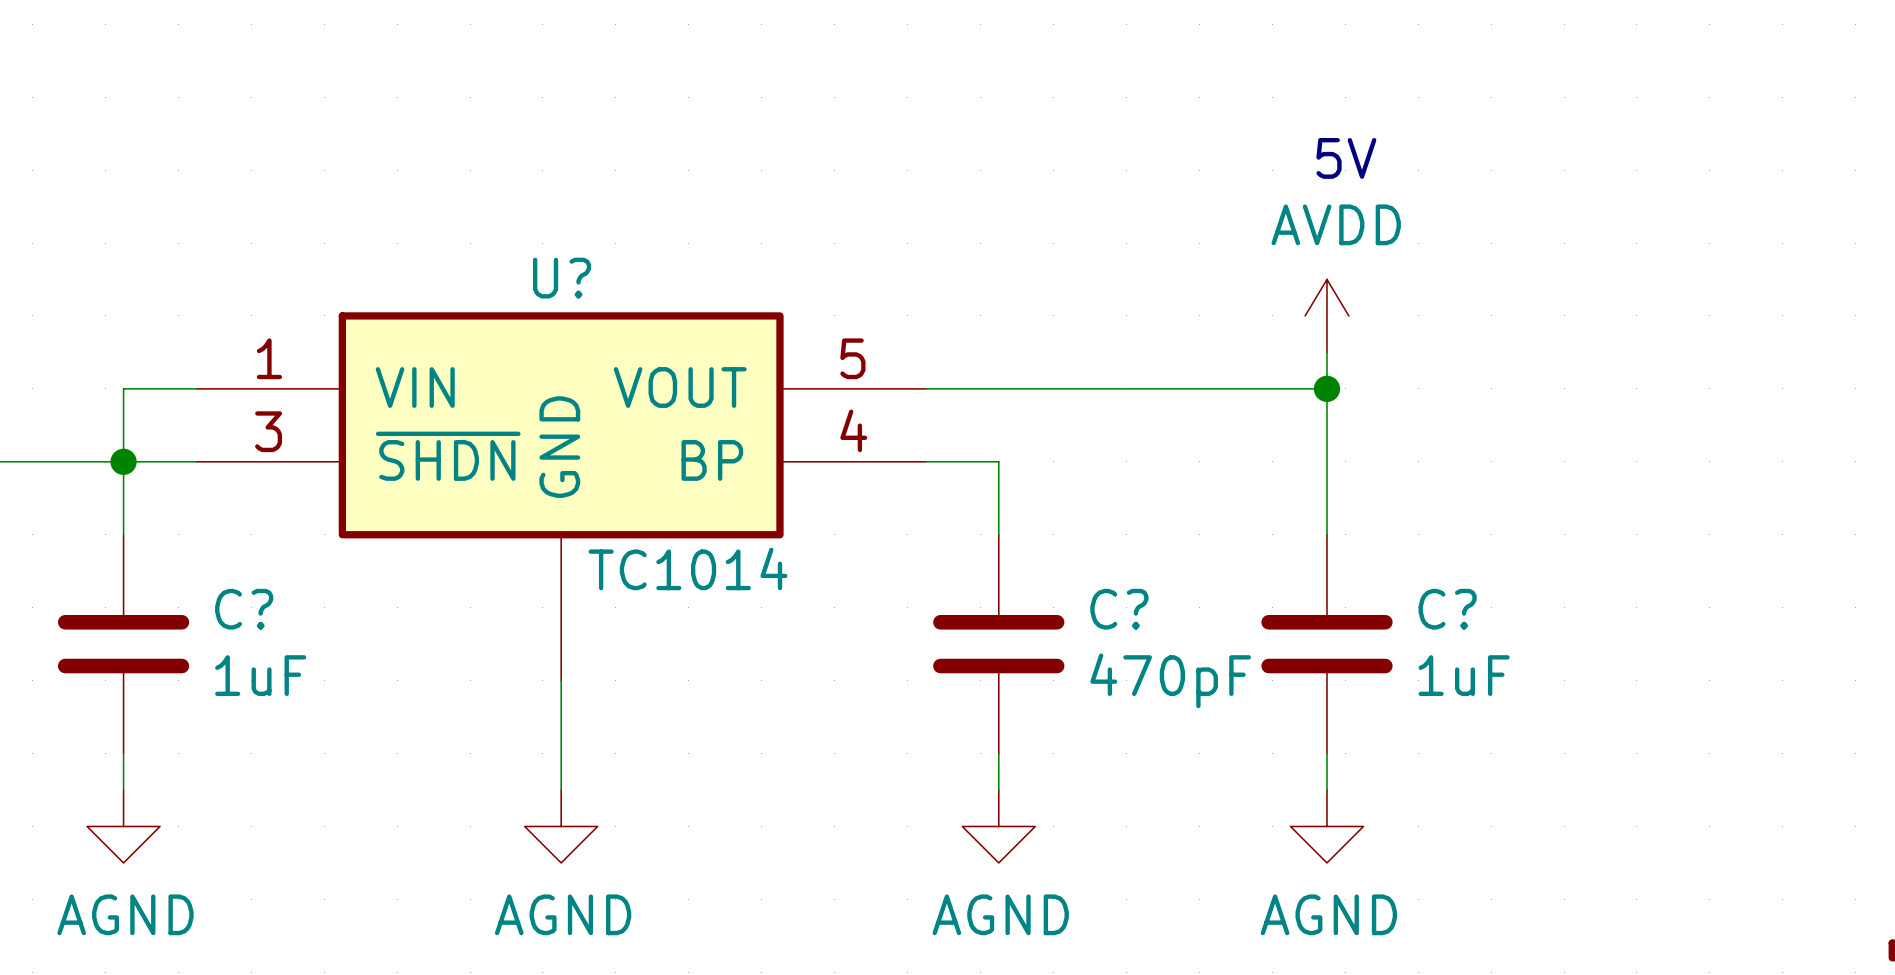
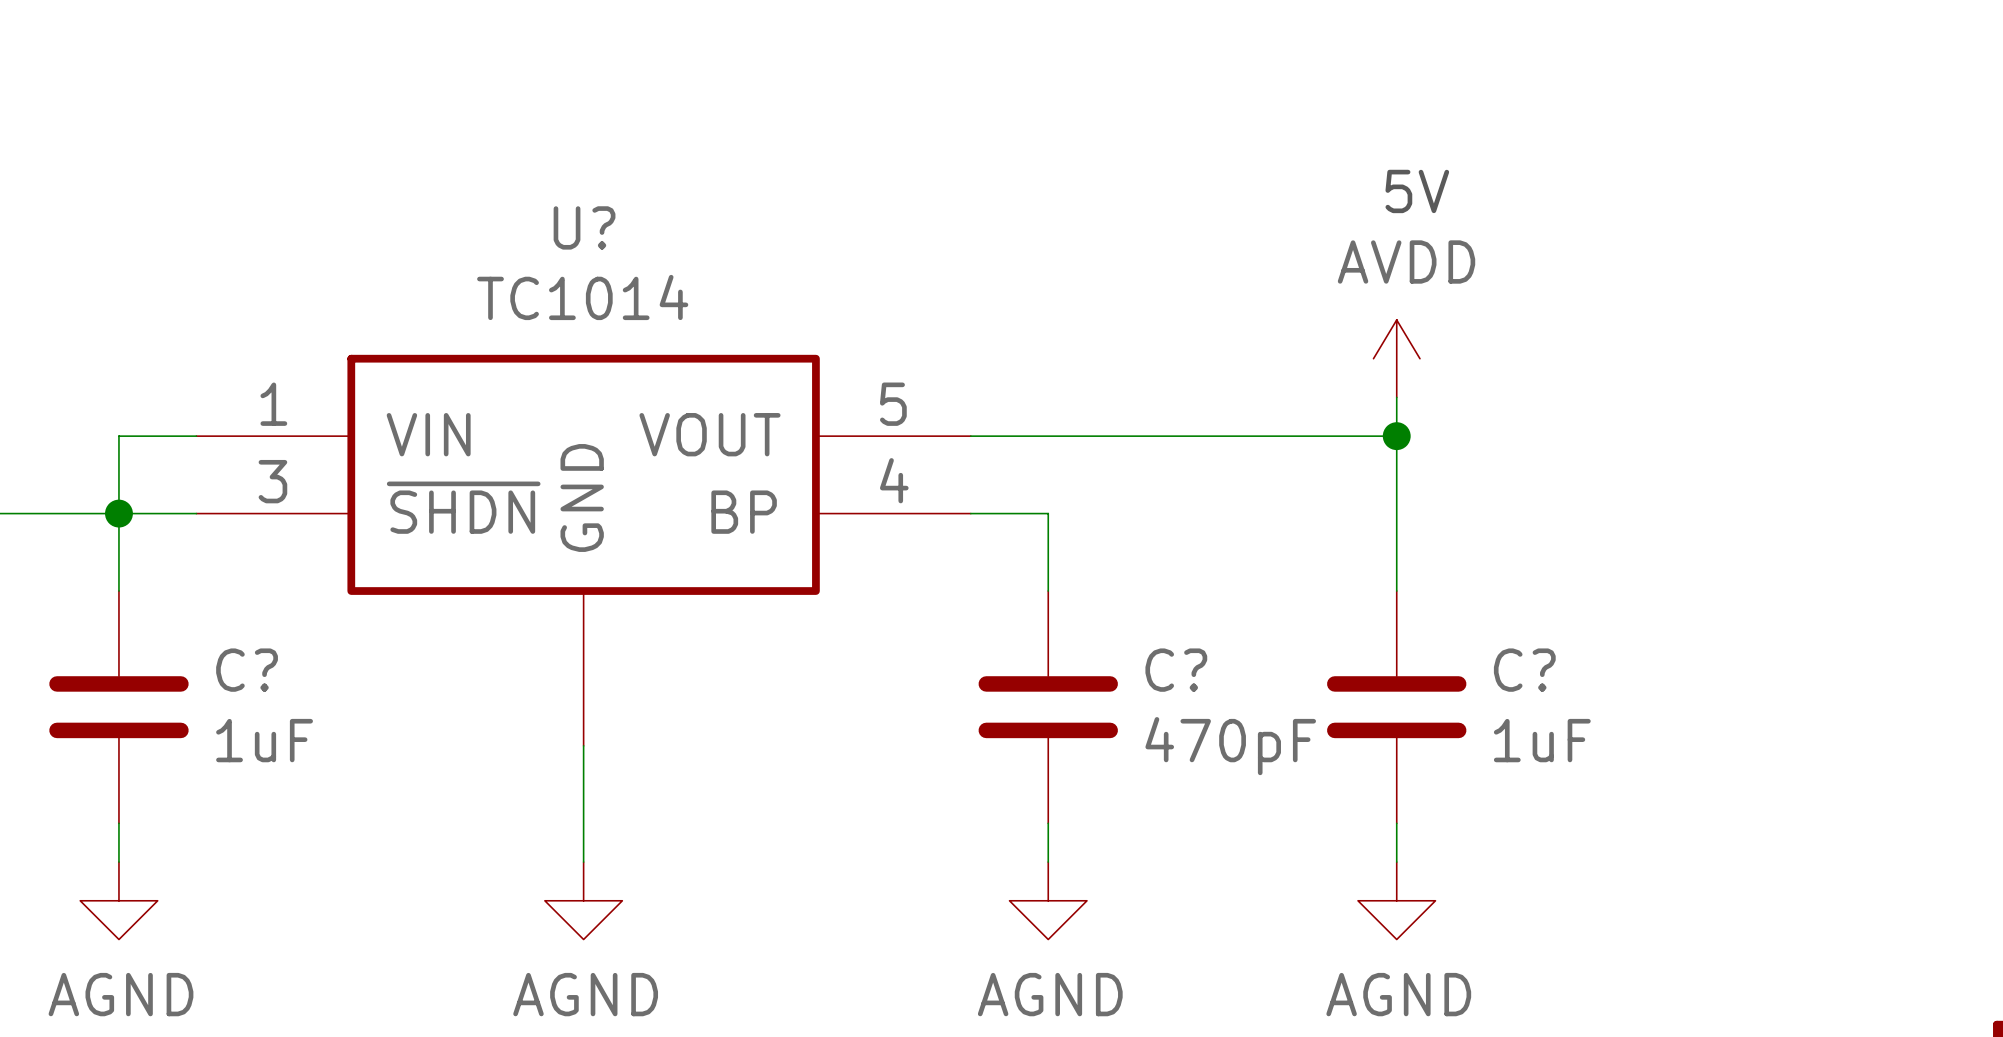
U? name position: U? (562, 278) -> U? (584, 227)
U? value position: TC1014 (687, 568) -> TC1014 (582, 297)

